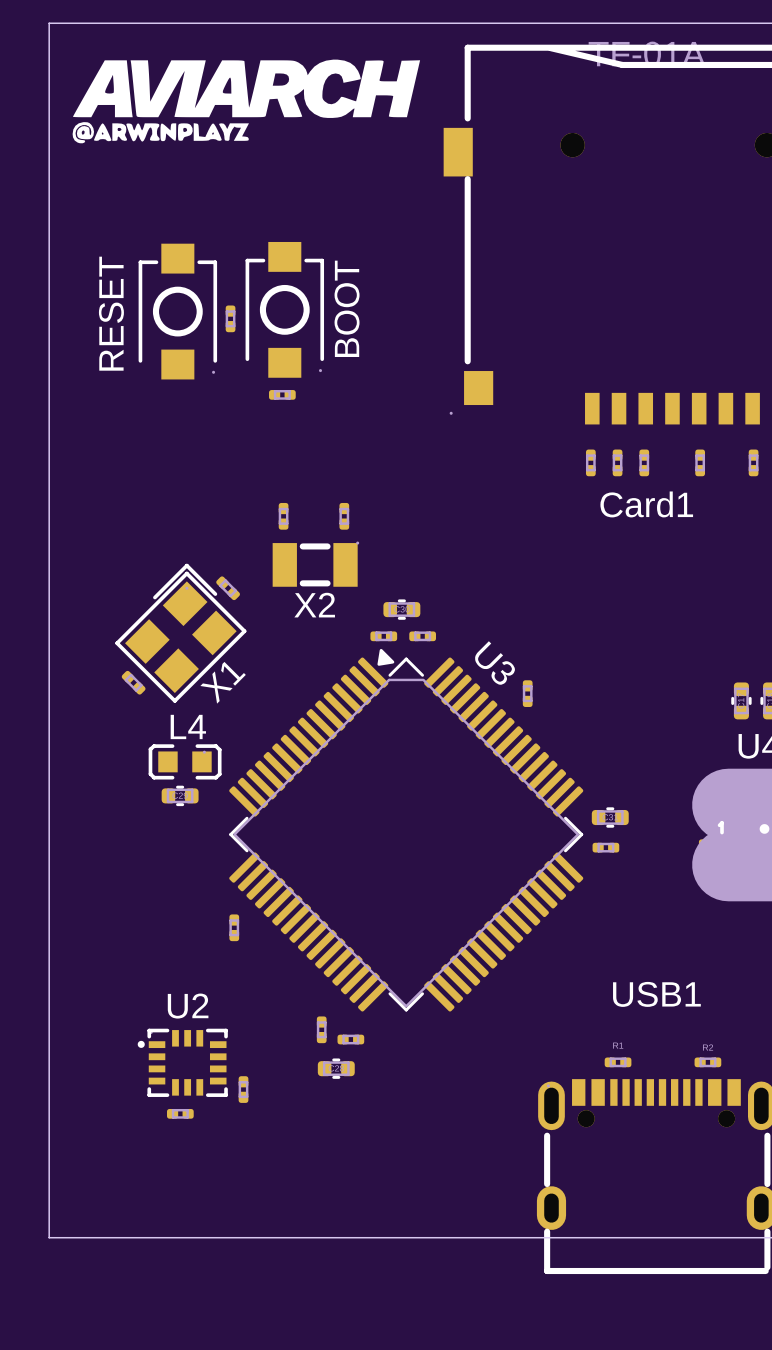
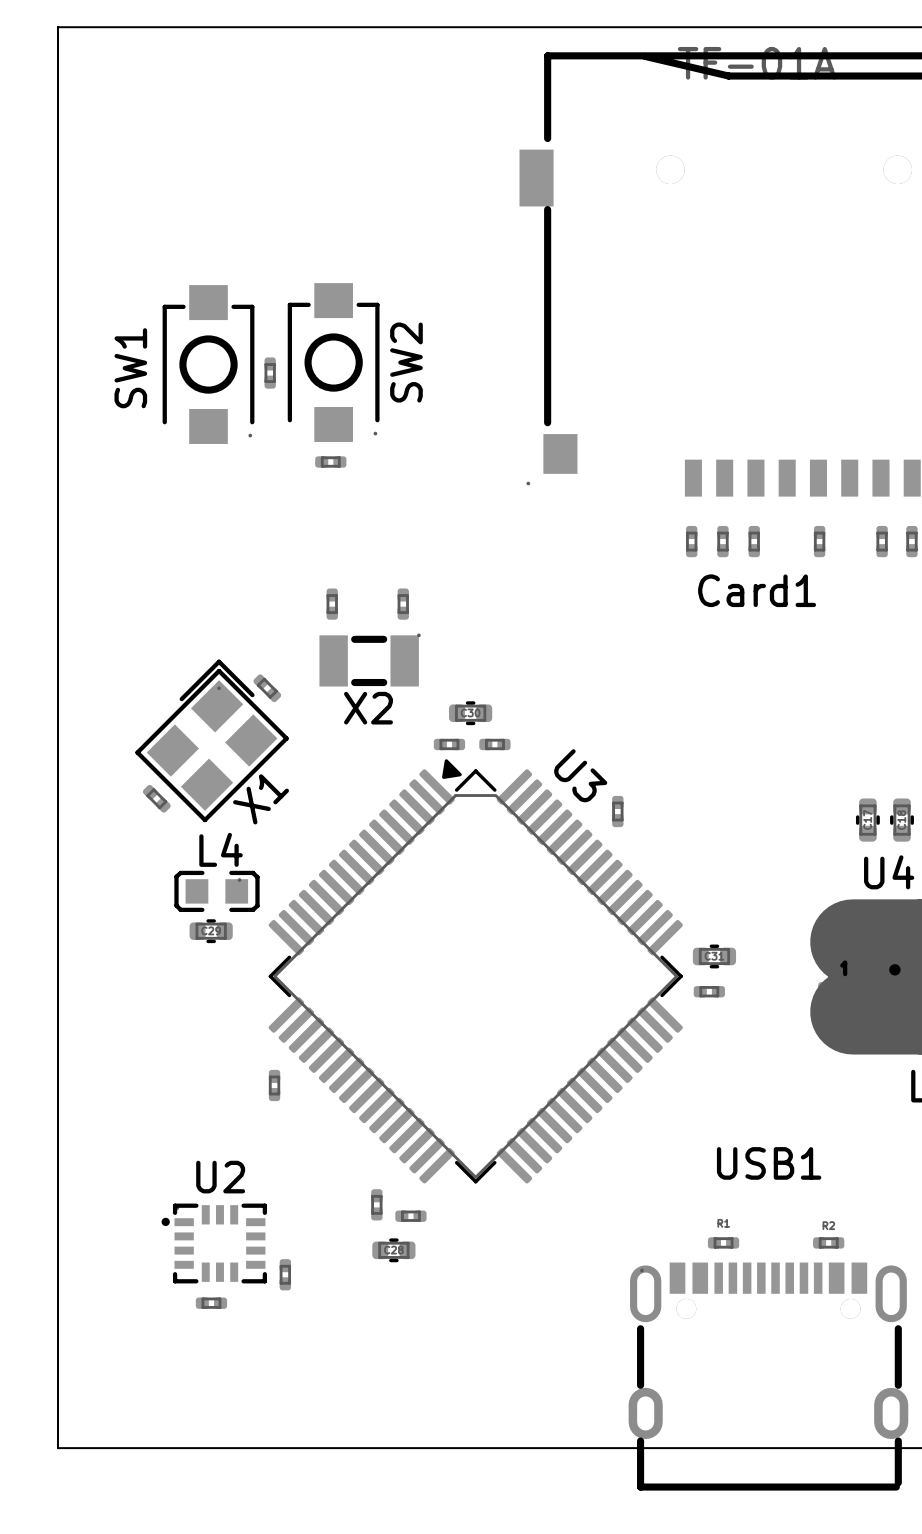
drawing: [72, 59, 421, 144] -> none
BOOT name: BOOT (347, 308) -> SW2 (406, 362)
RESET name: RESET (111, 313) -> SW1 (130, 368)

